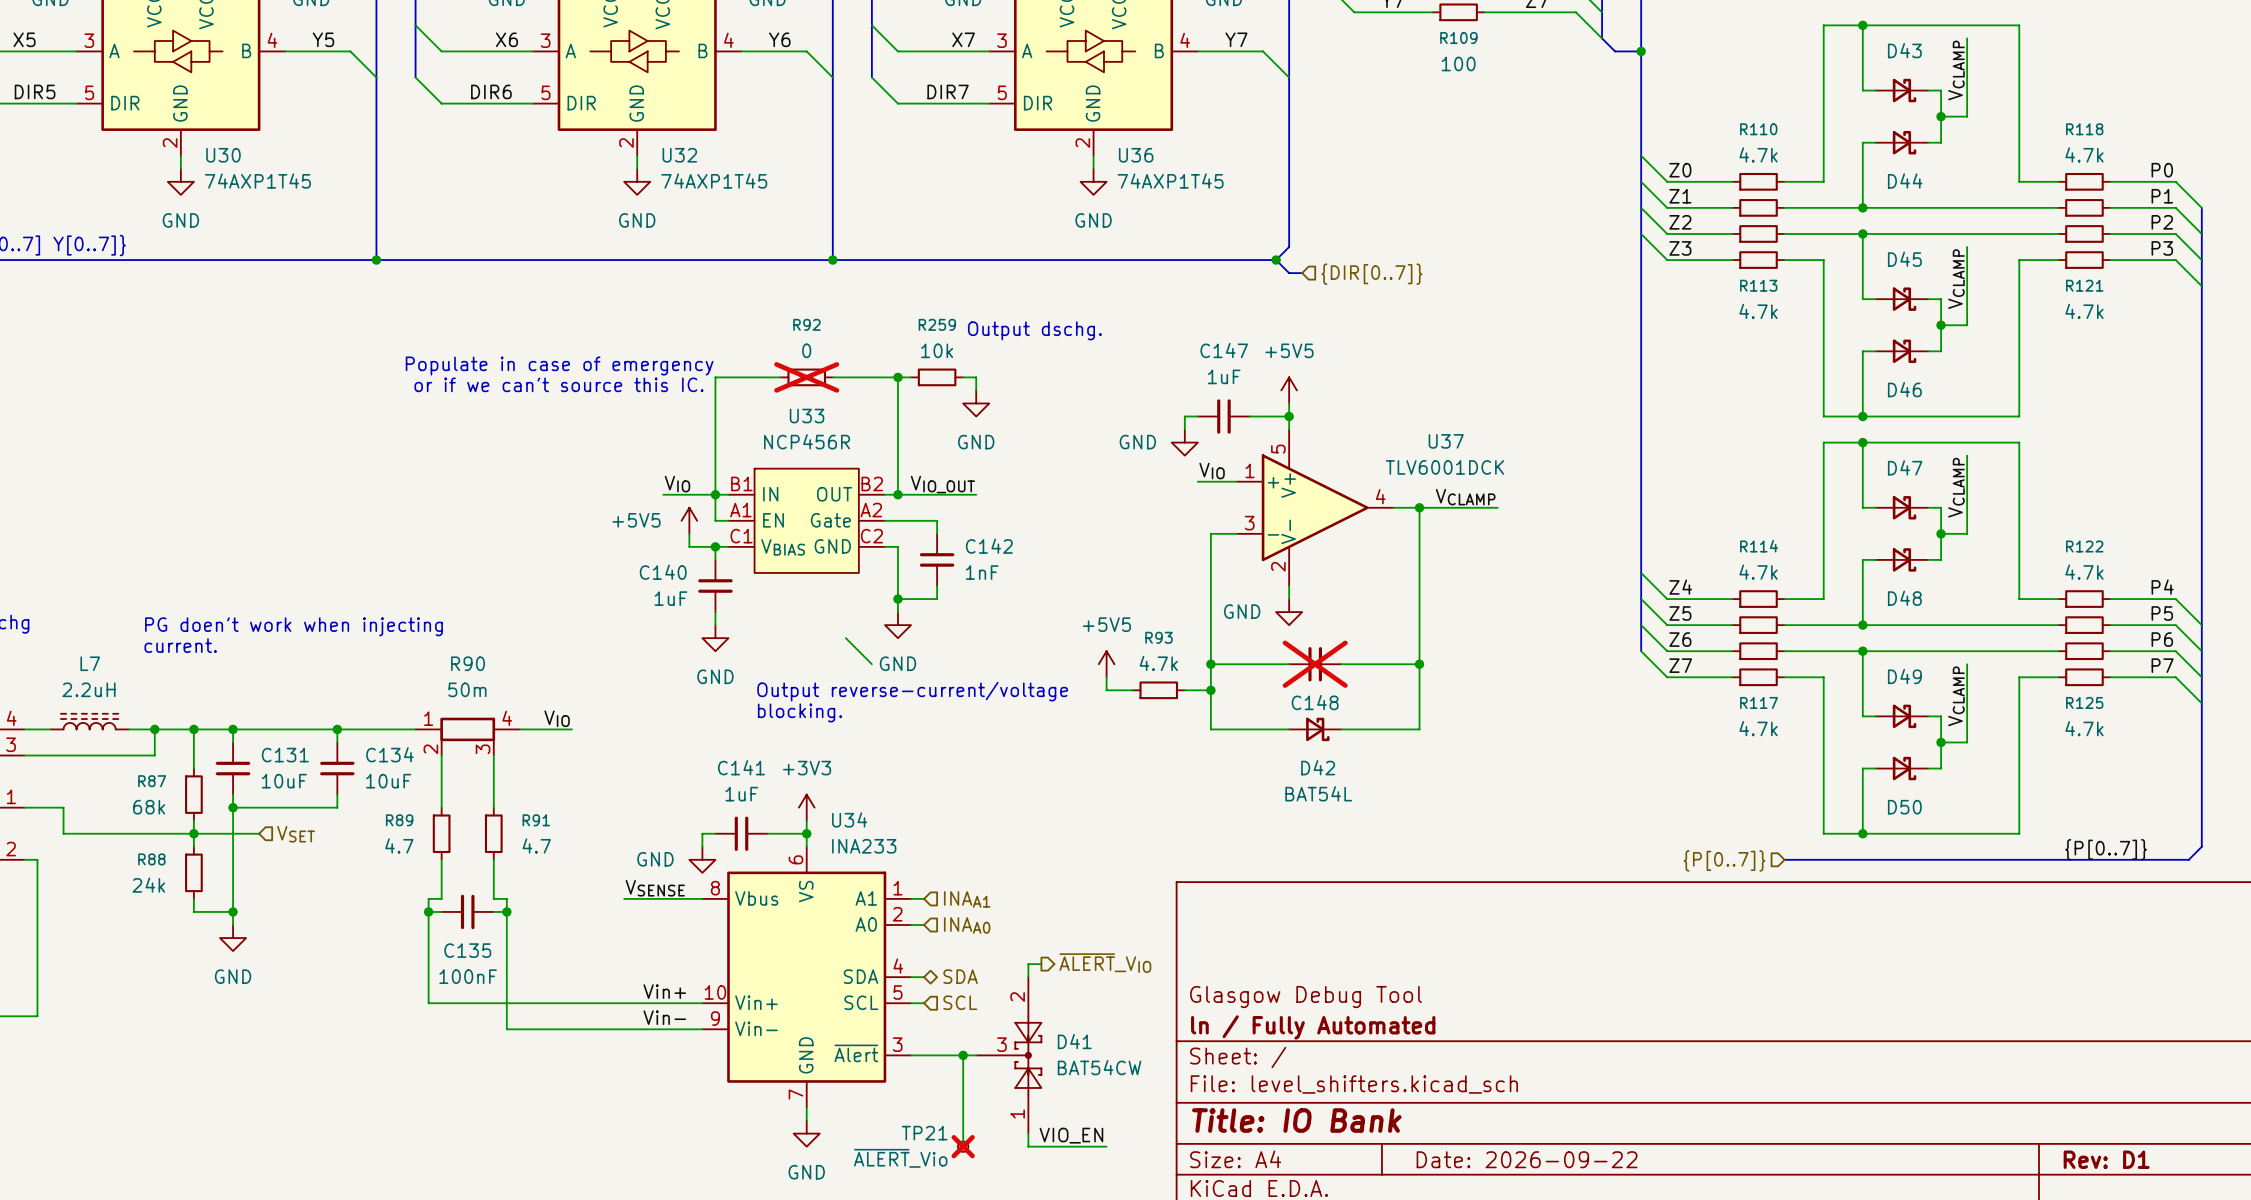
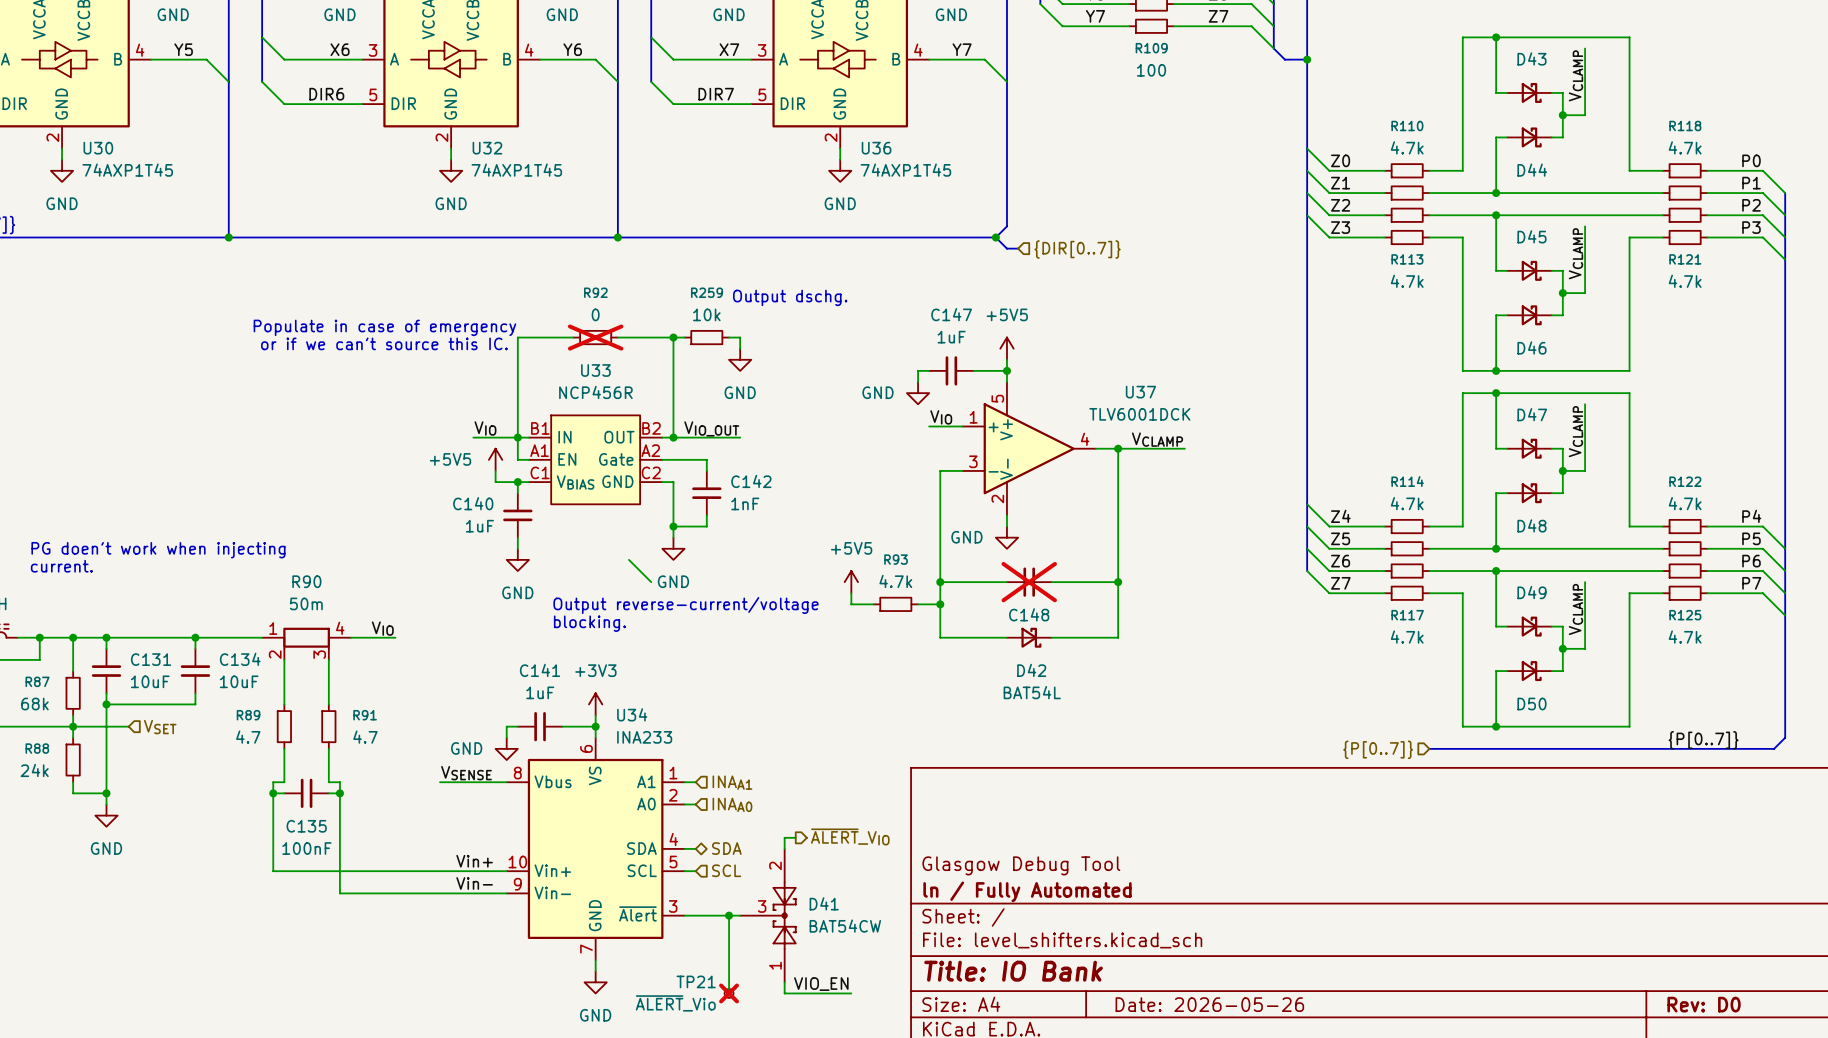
title block: Date: 2026-09-22 (1527, 1159) -> Date: 2026-05-26 (1209, 1004)
title block: Rev: D1 (2106, 1159) -> Rev: D0 (1704, 1004)

